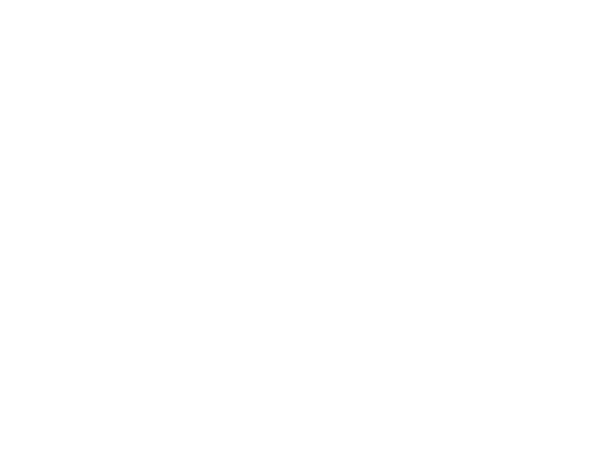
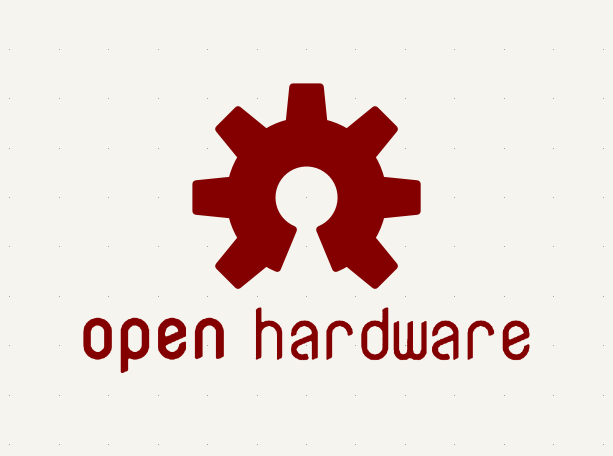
part: none -> (306, 228)

